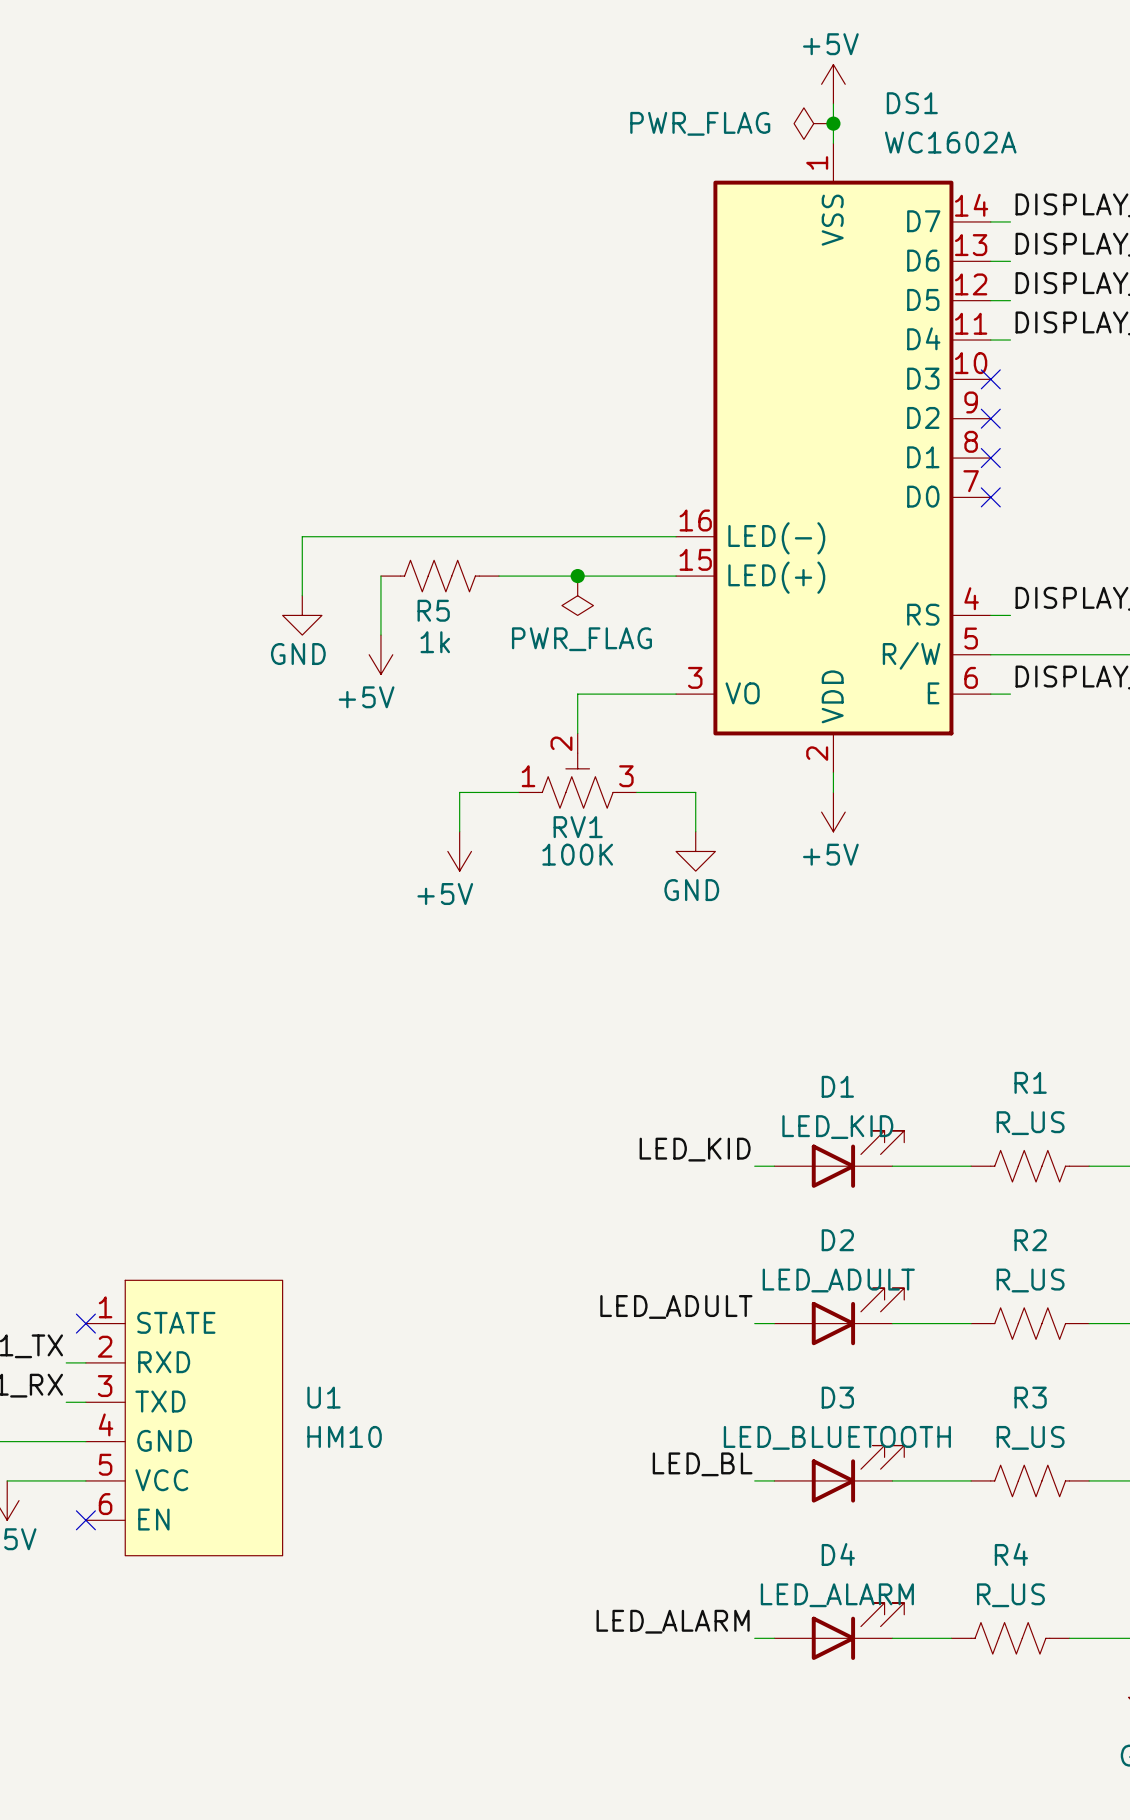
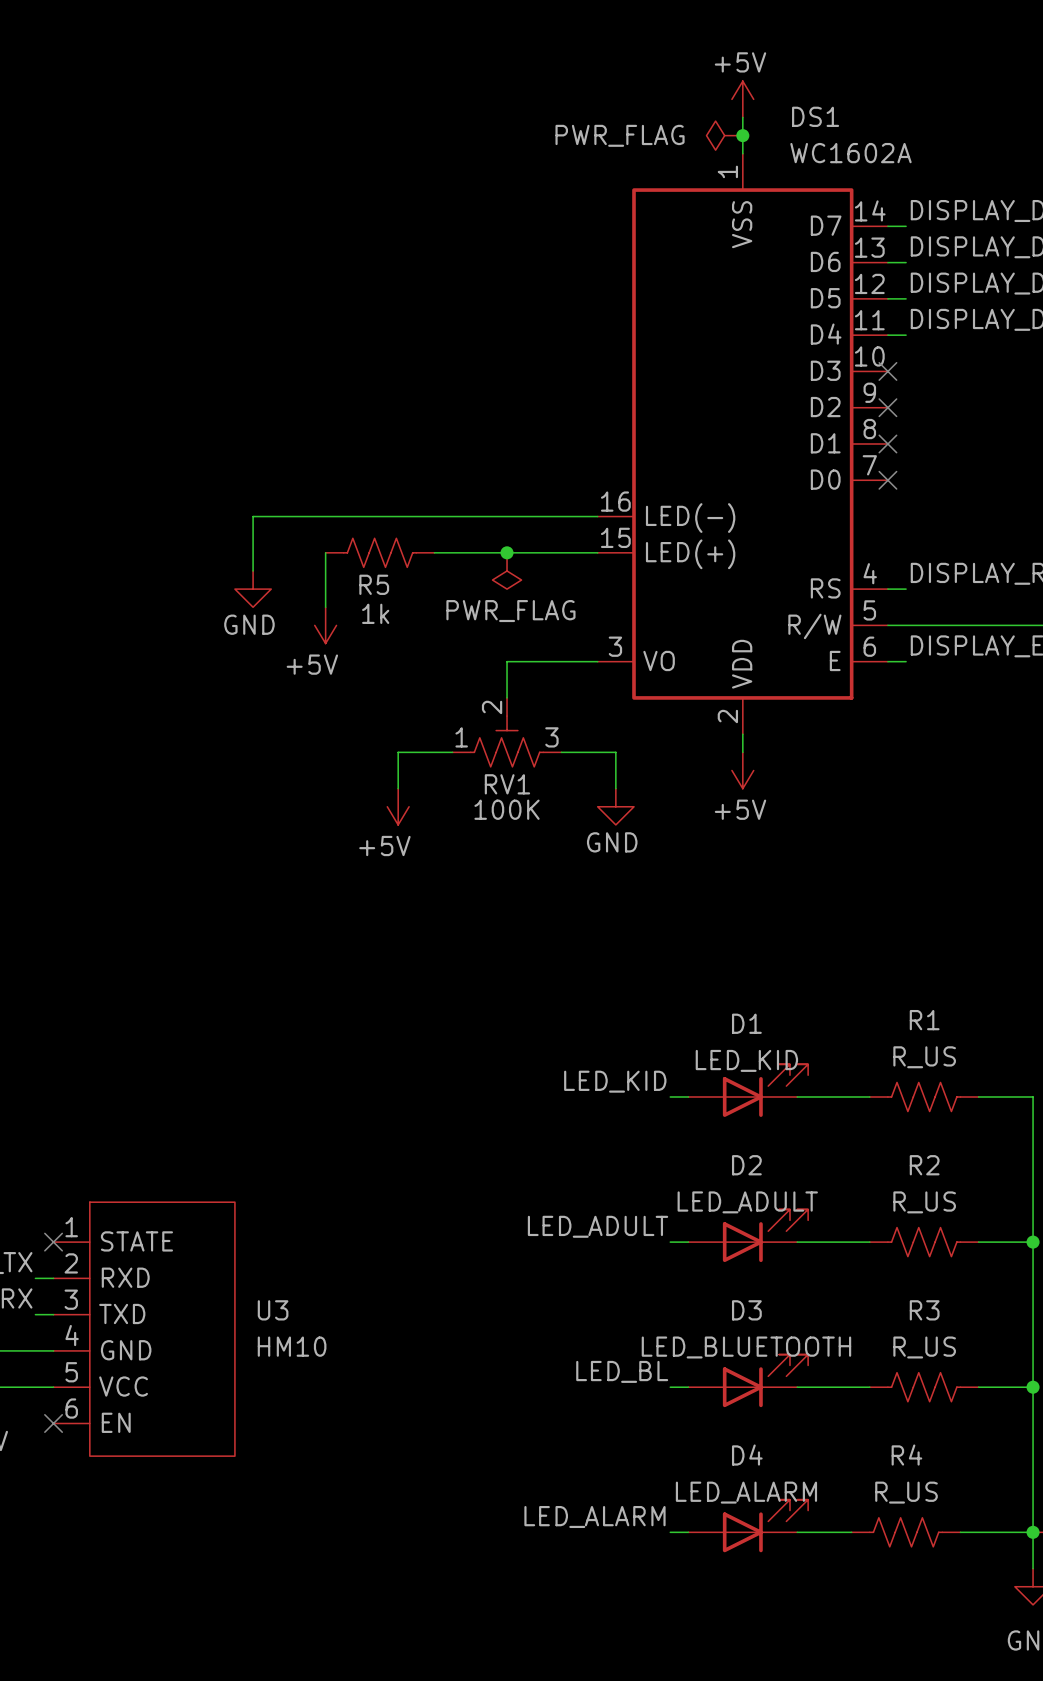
U1 name: U1 (323, 1397) -> U3 (273, 1310)

